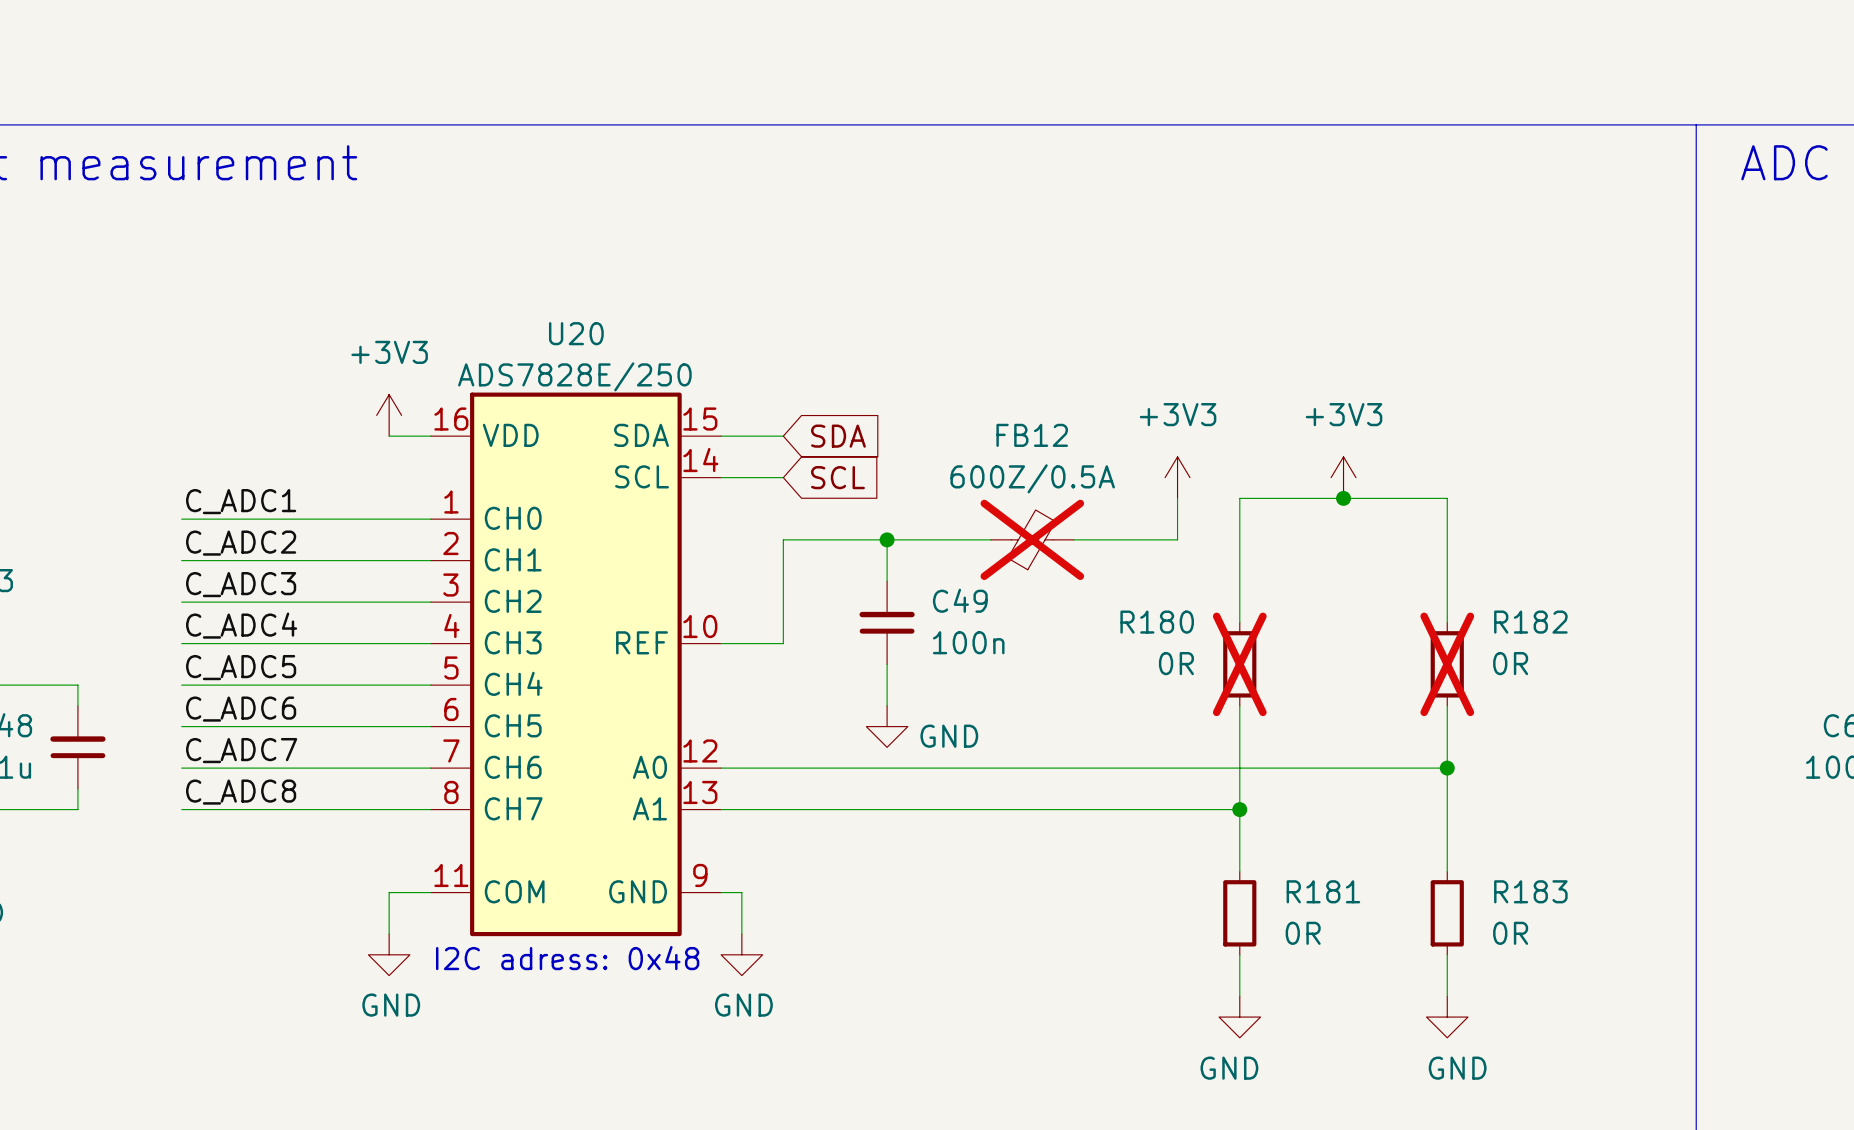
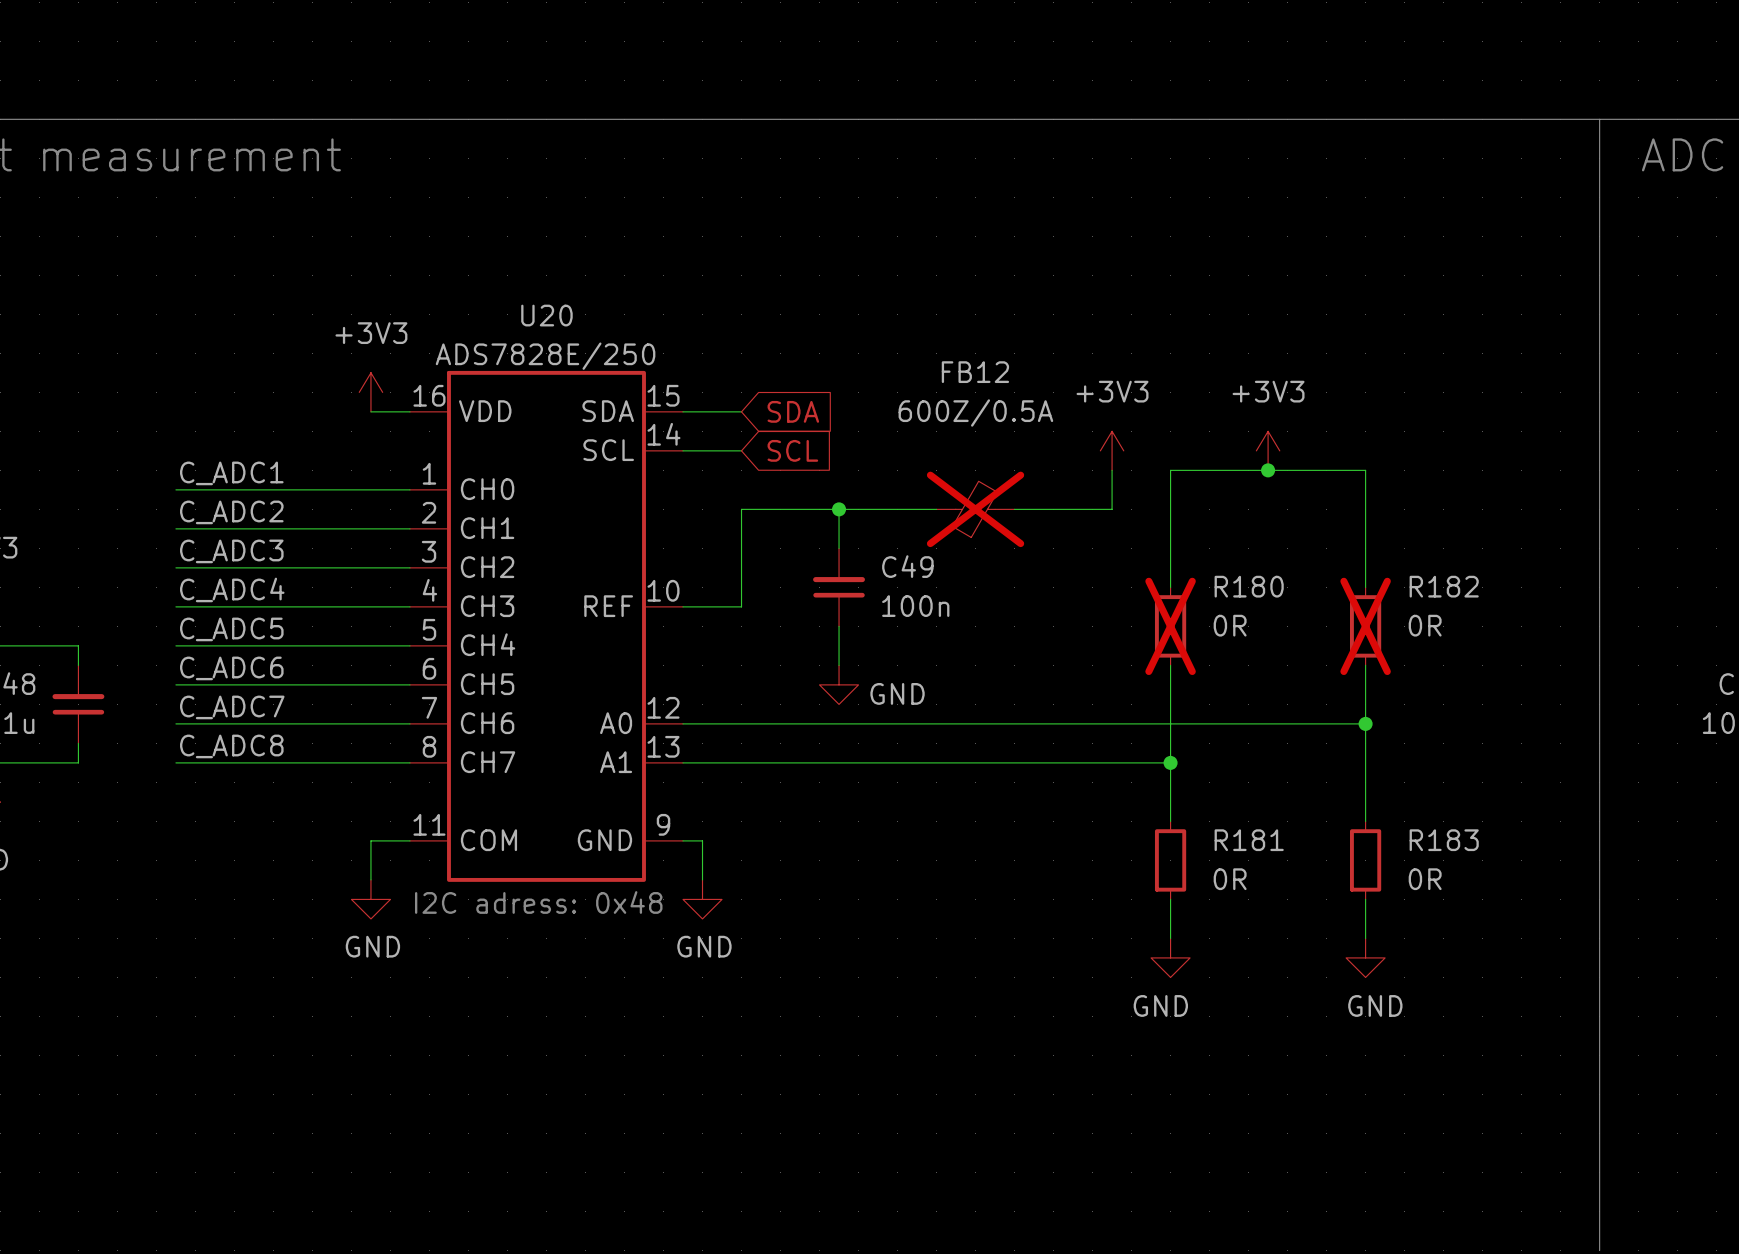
FB12 name position: FB12 (1032, 435) -> FB12 (975, 372)
FB12 text position: 600Z/0.5A (1032, 478) -> 600Z/0.5A (975, 412)
R180 name position: R180 (1157, 622) -> R180 (1249, 586)
R180 text position: 0R (1176, 663) -> 0R (1230, 625)

